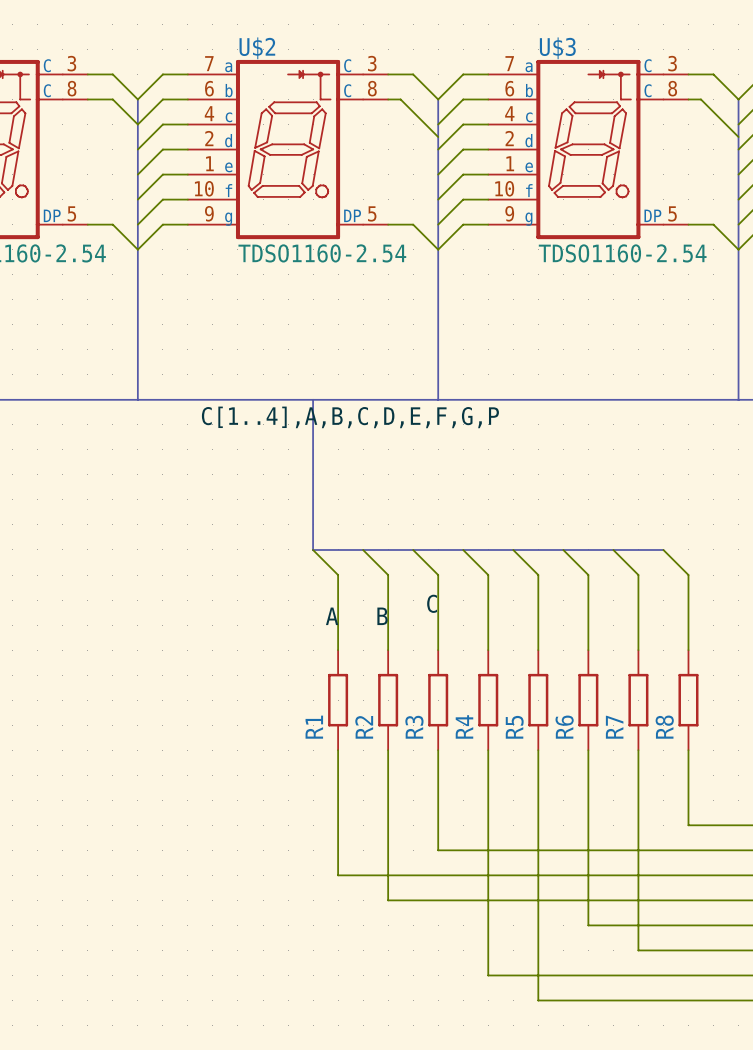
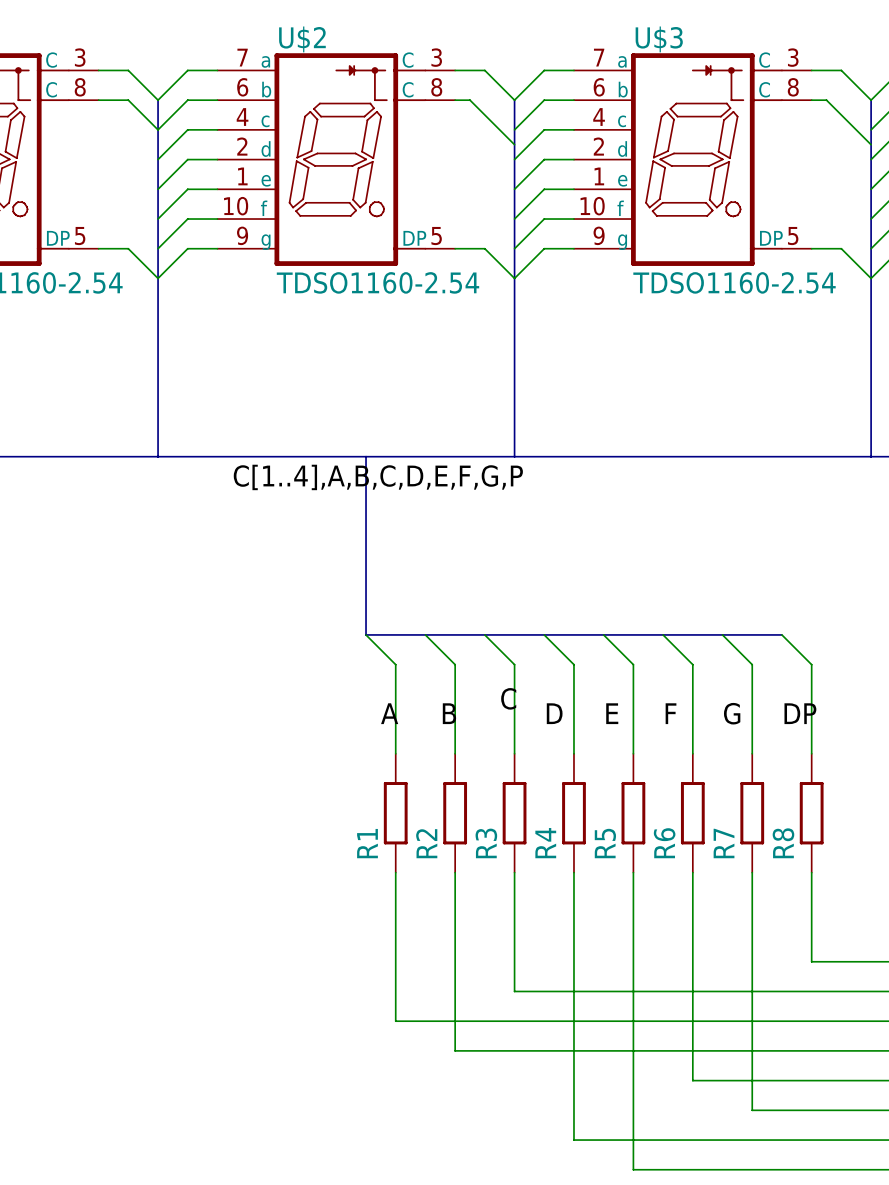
label: none -> D (554, 713)
label: none -> E (612, 713)
label: none -> F (671, 713)
label: none -> G (732, 713)
label: none -> DP (800, 713)

